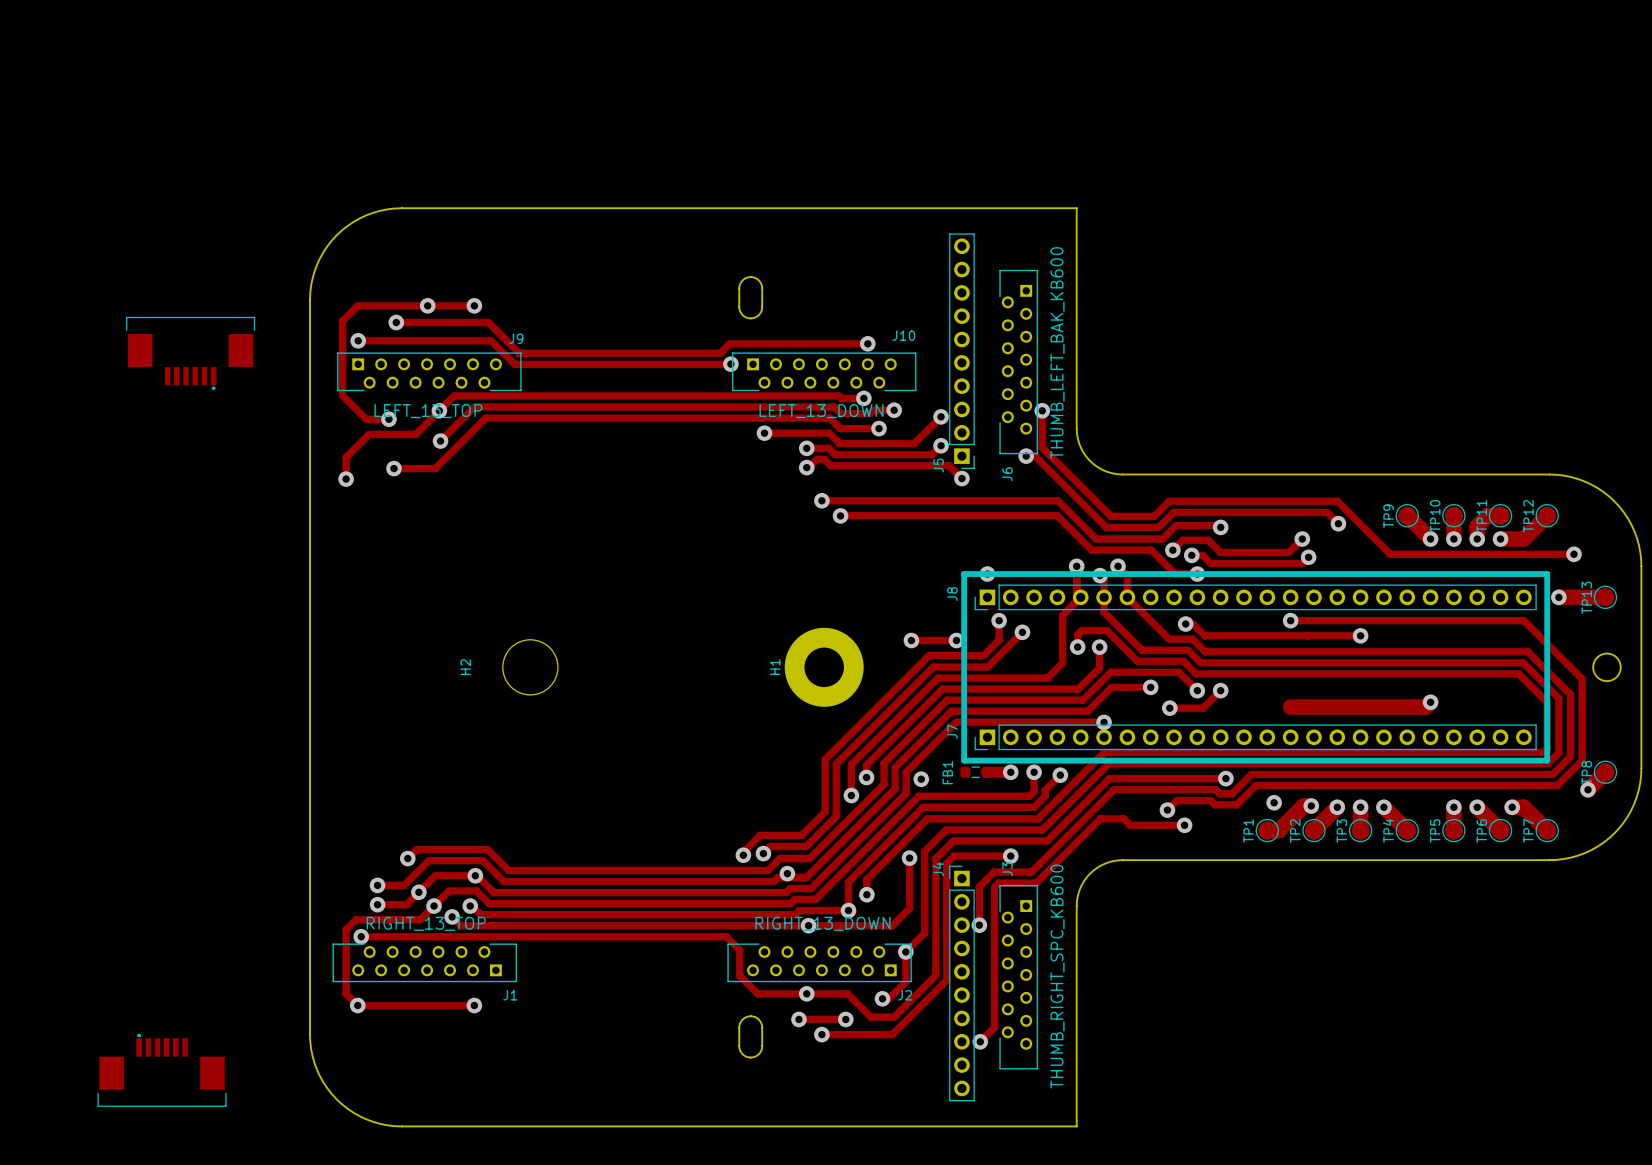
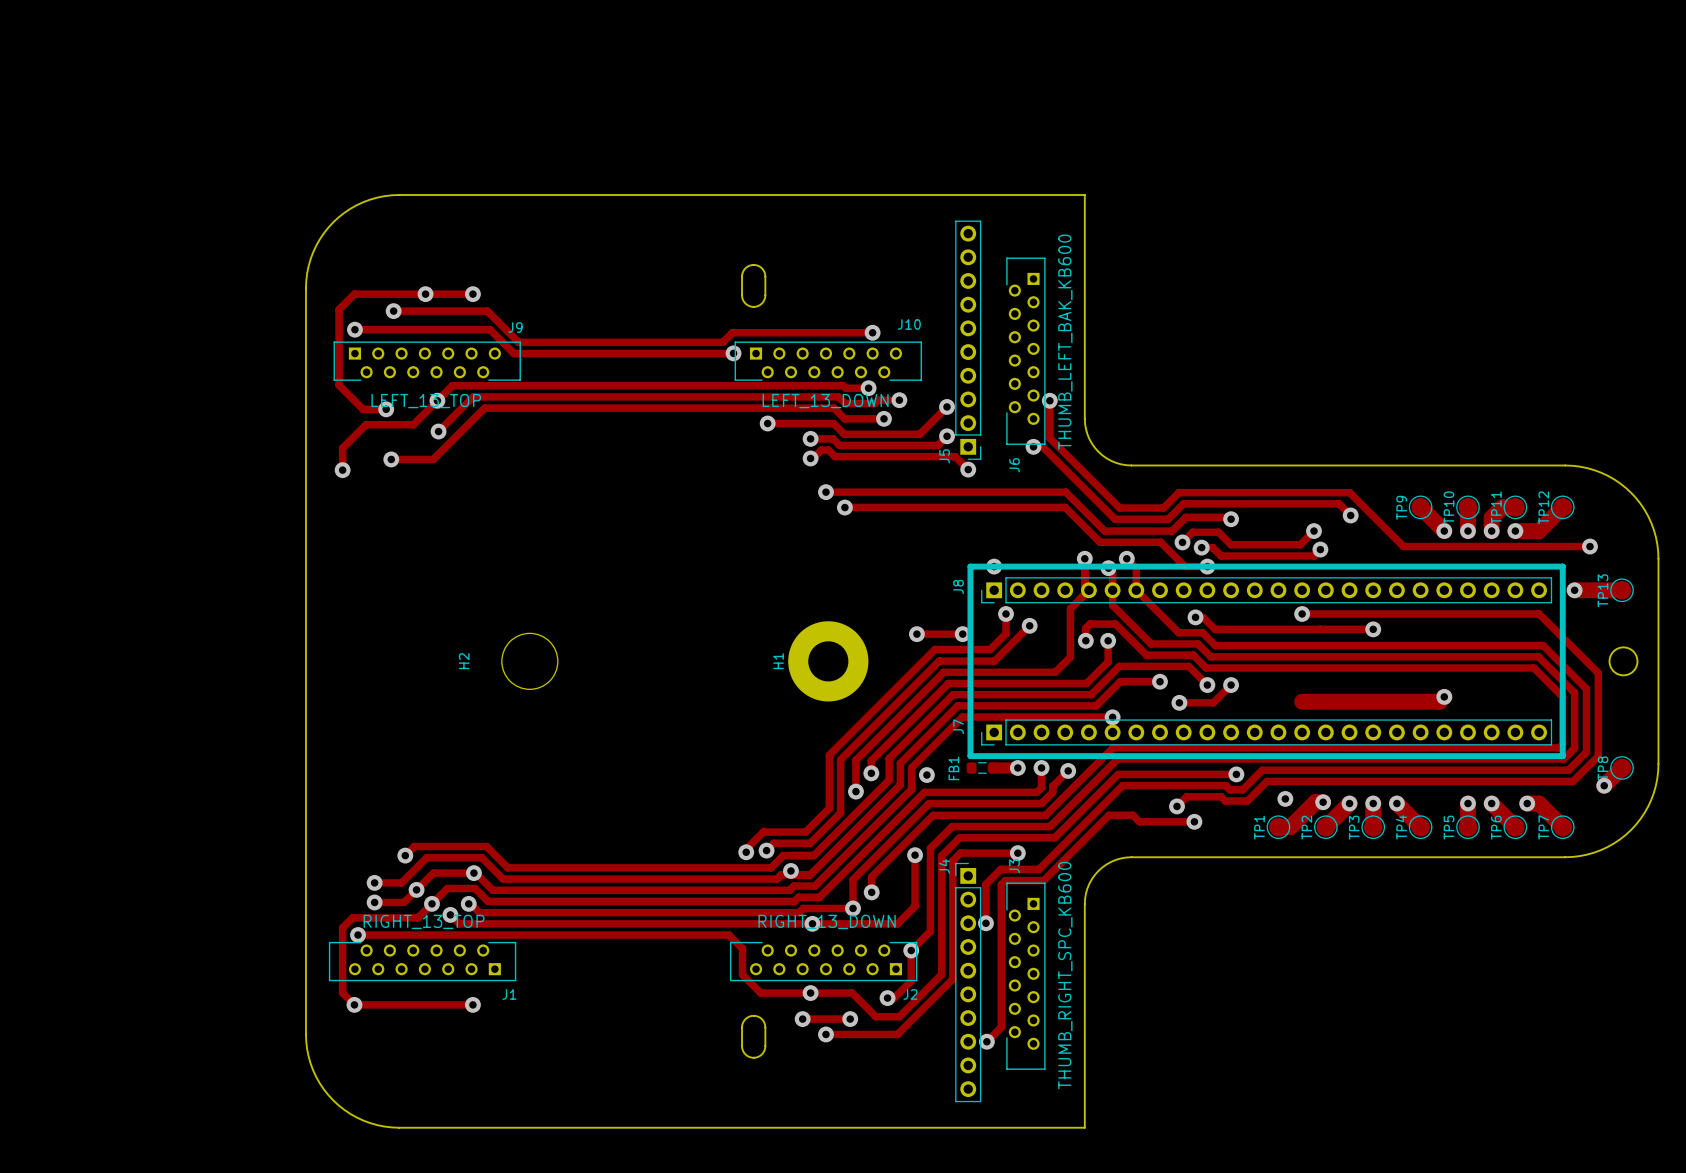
part: (190, 353) -> none
part: (162, 1070) -> none

